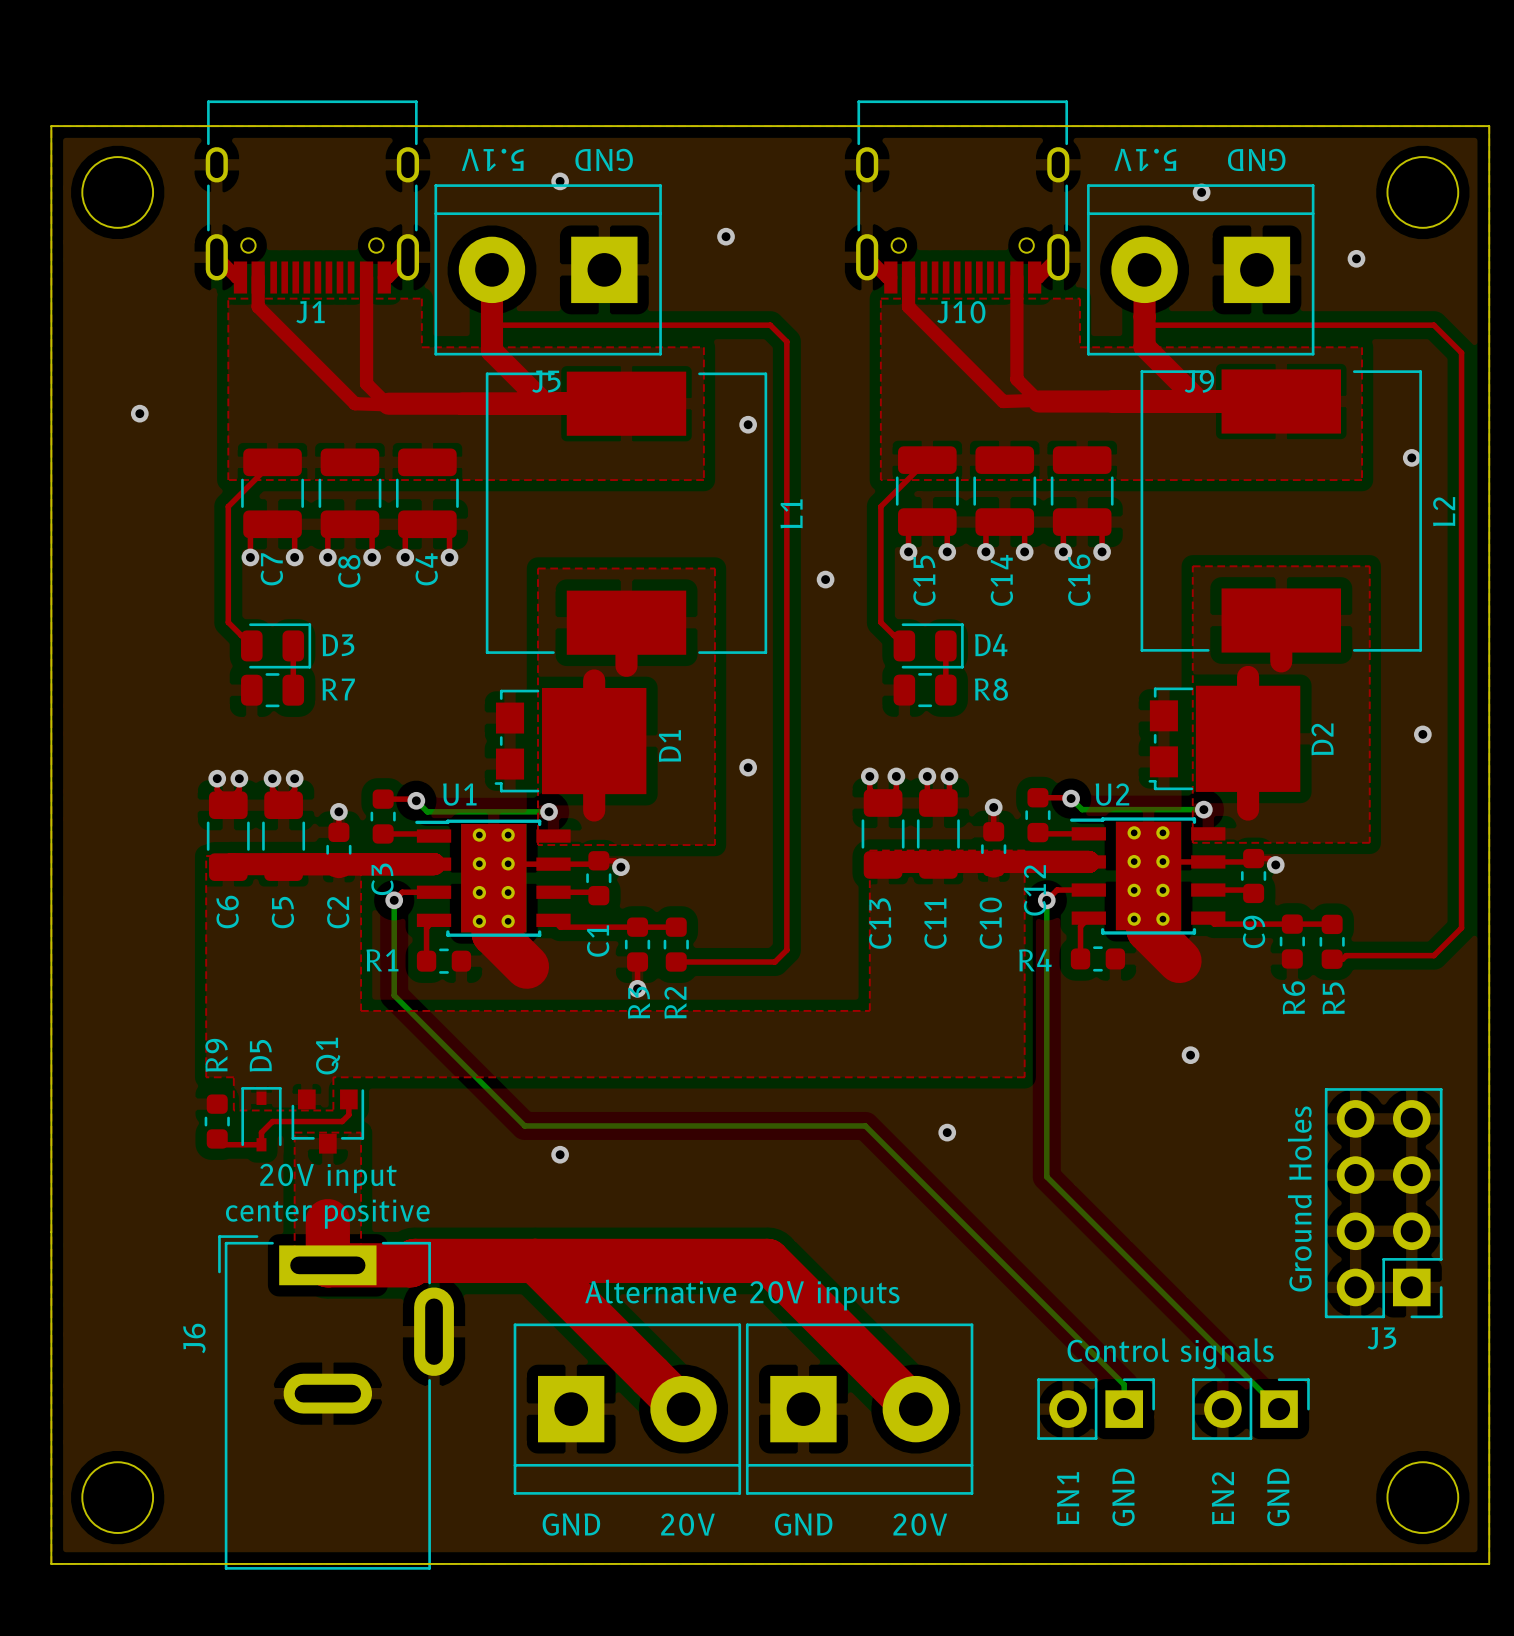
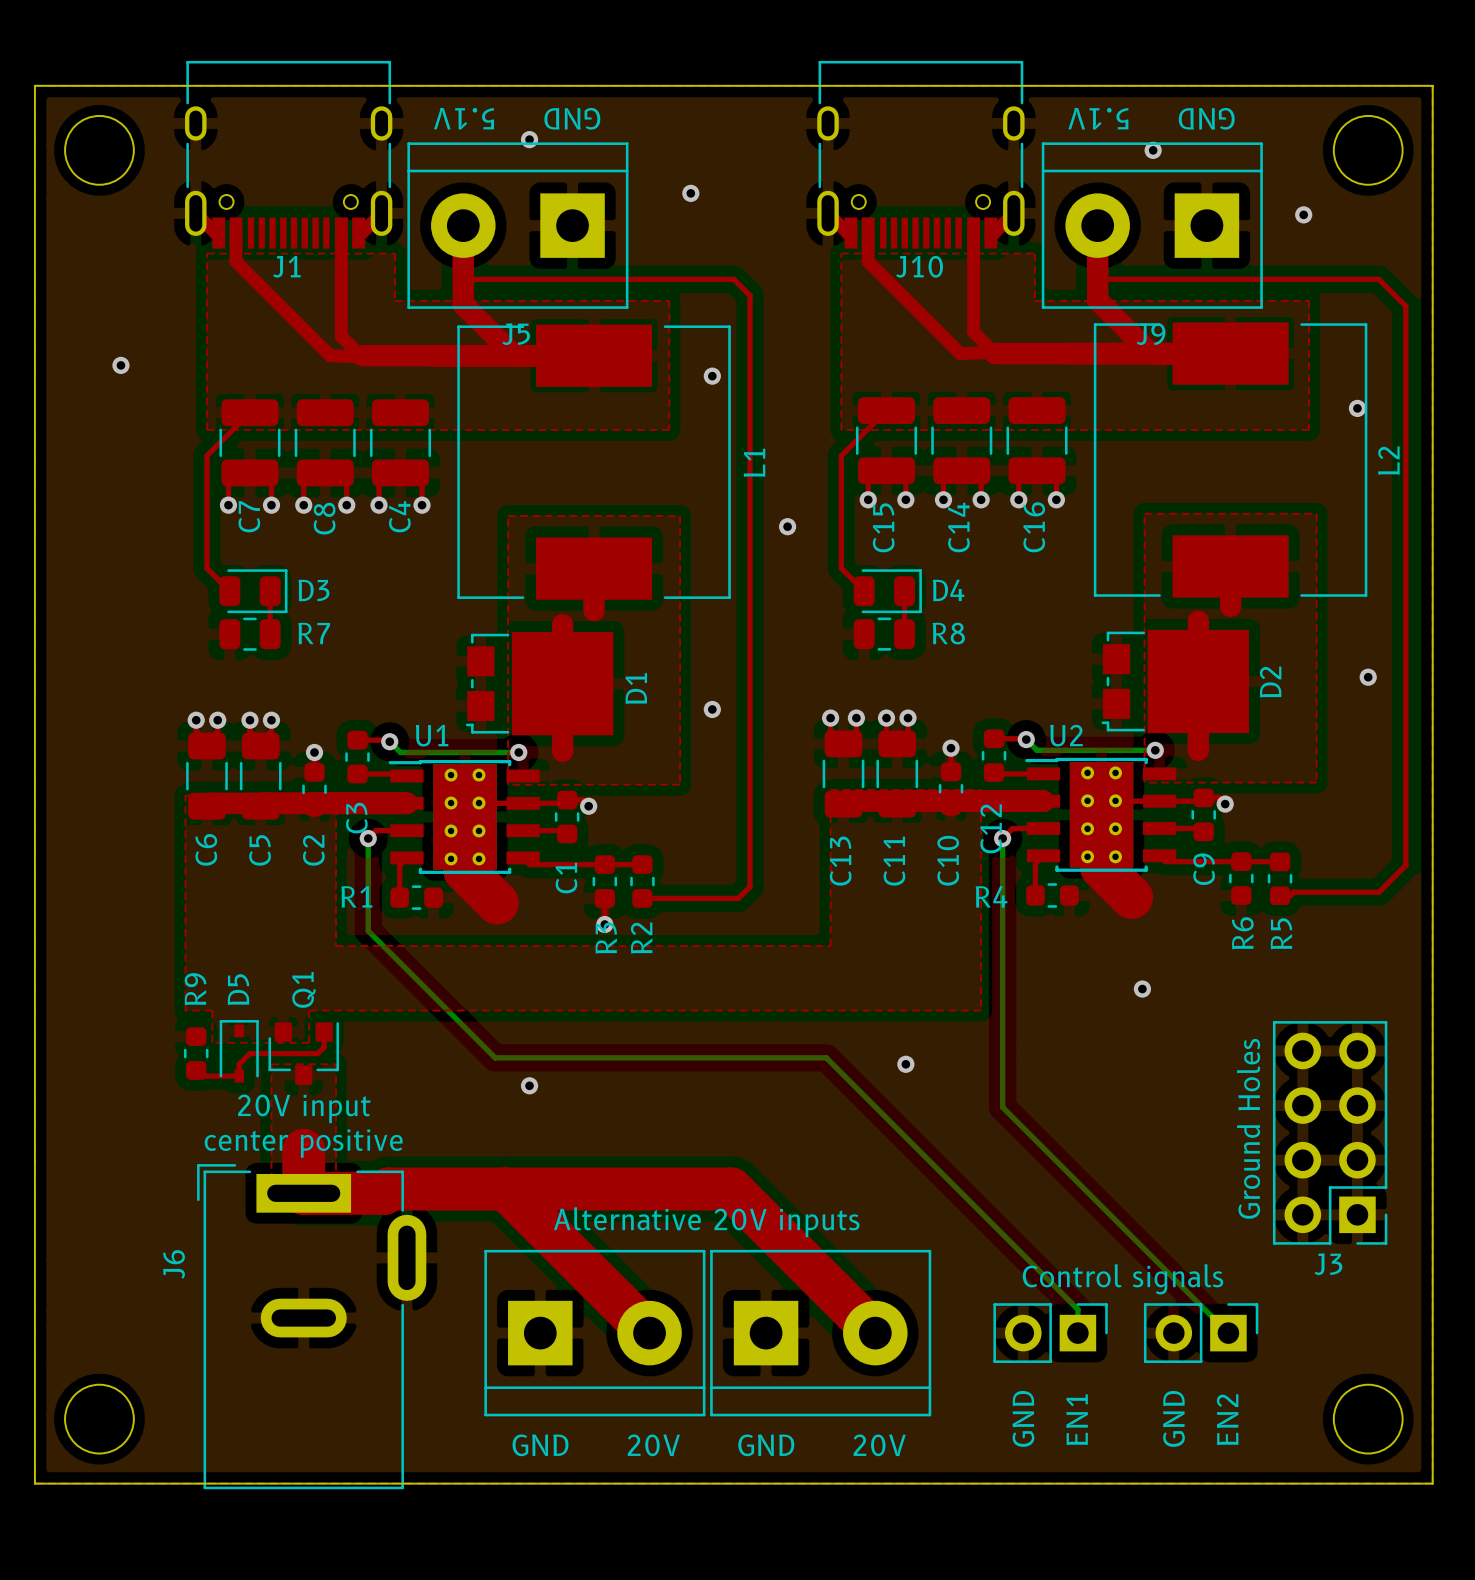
text: GND (1123, 1497) -> EN1 (1077, 1419)
text: GND (1278, 1497) -> EN2 (1227, 1419)
text: EN1 (1068, 1498) -> GND (1023, 1418)
text: EN2 (1222, 1498) -> GND (1173, 1418)

